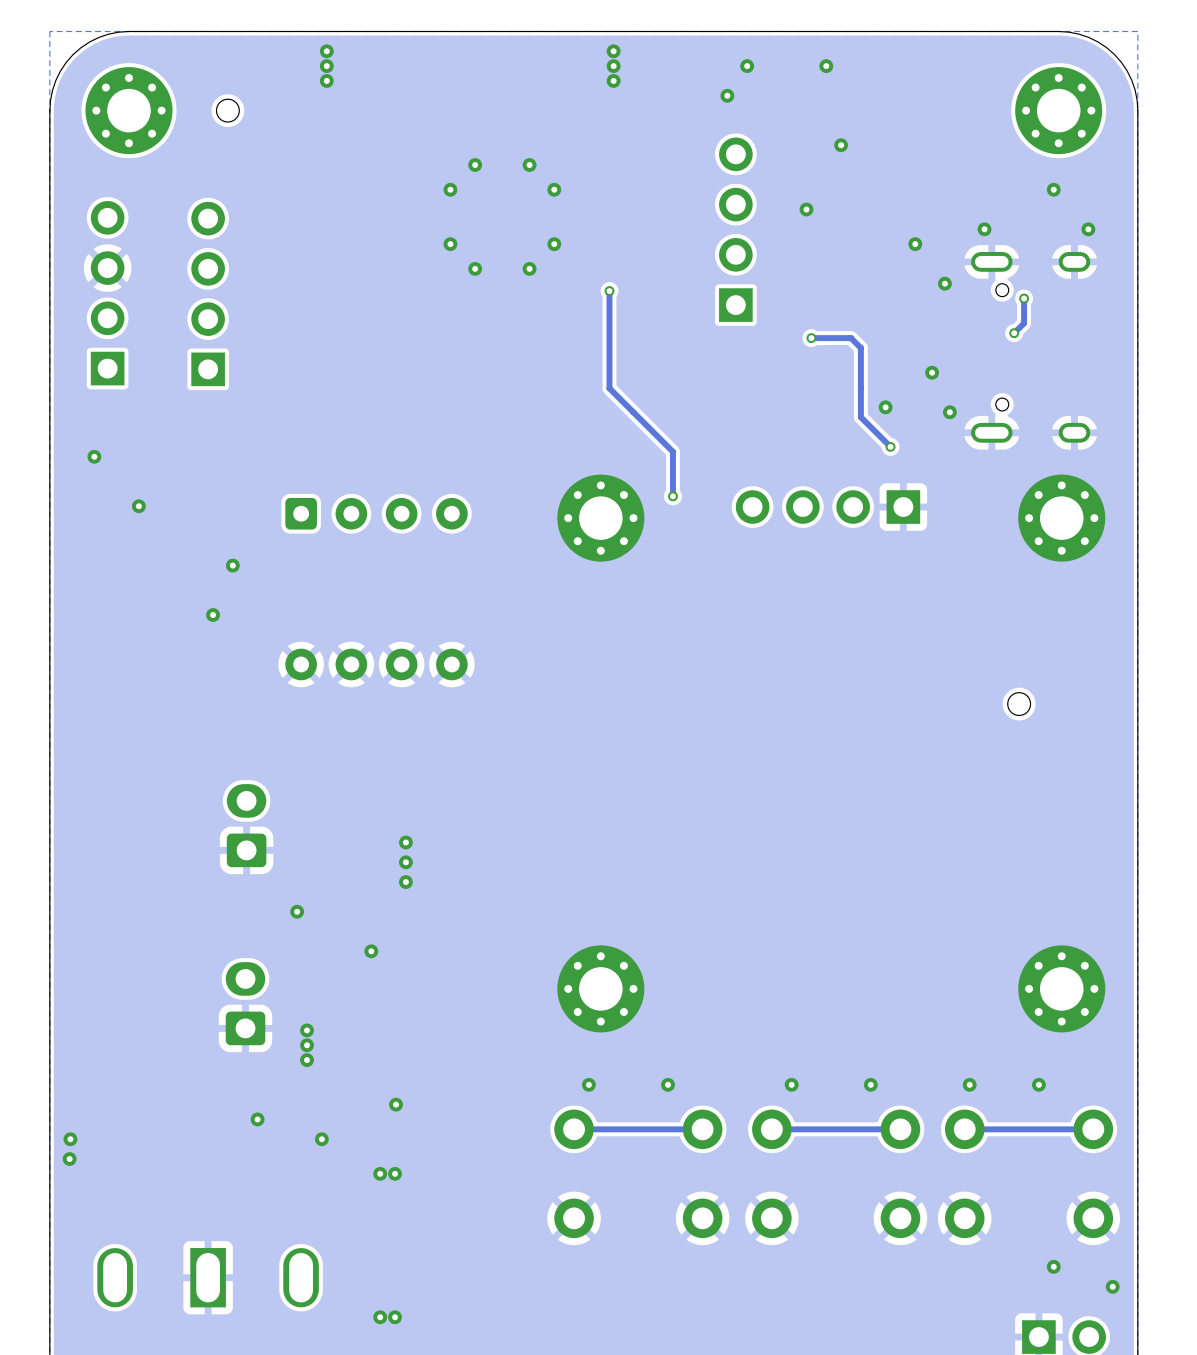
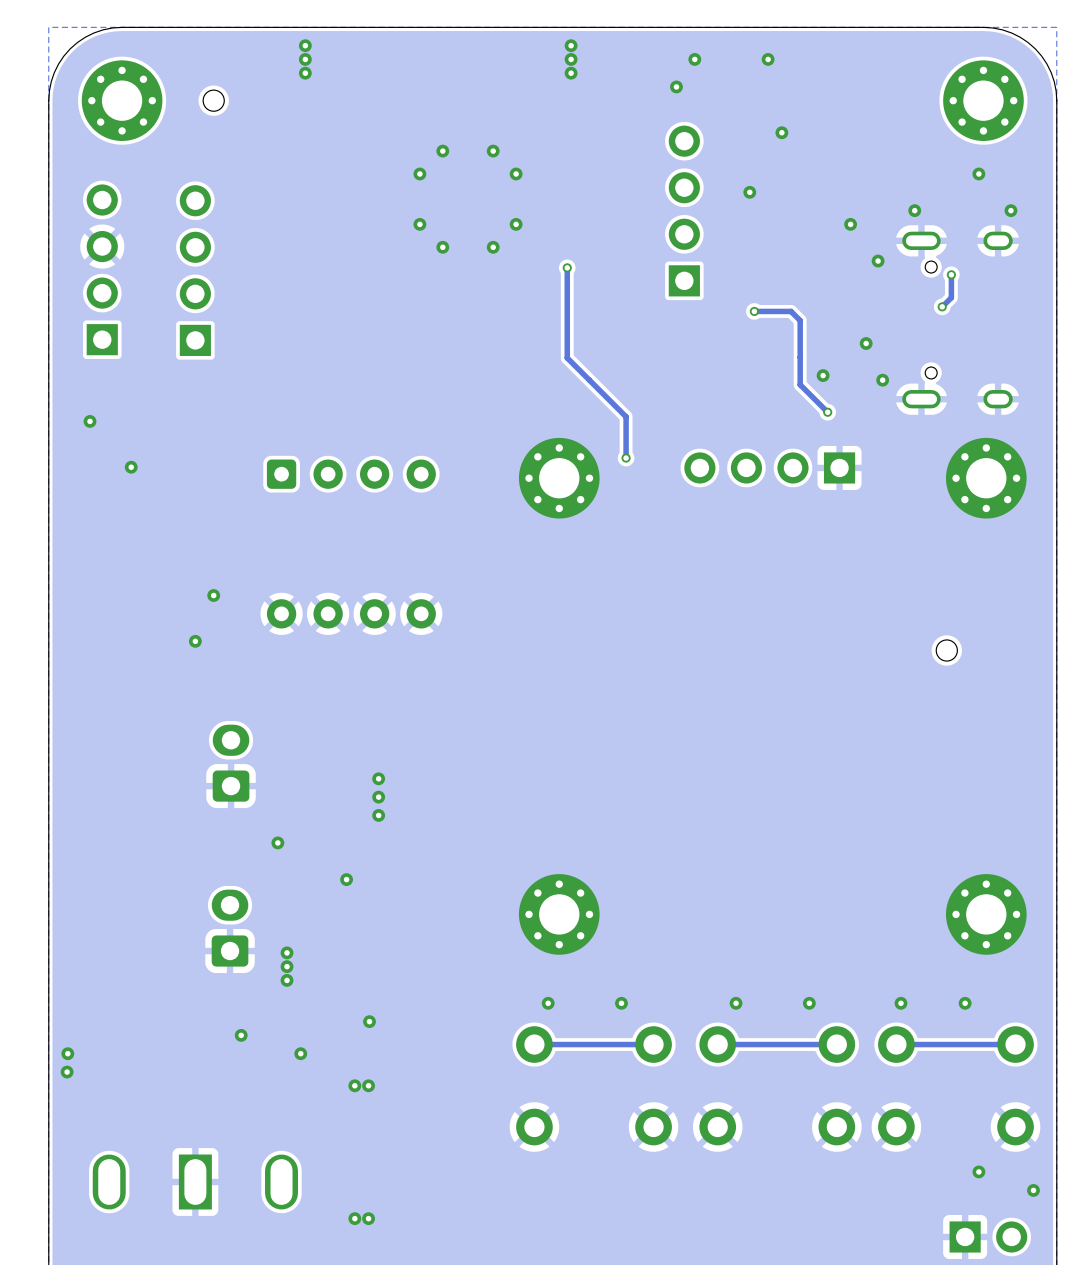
via: (232, 565) -> none
via position: (213, 615) -> (213, 595)
via: none -> (195, 641)

